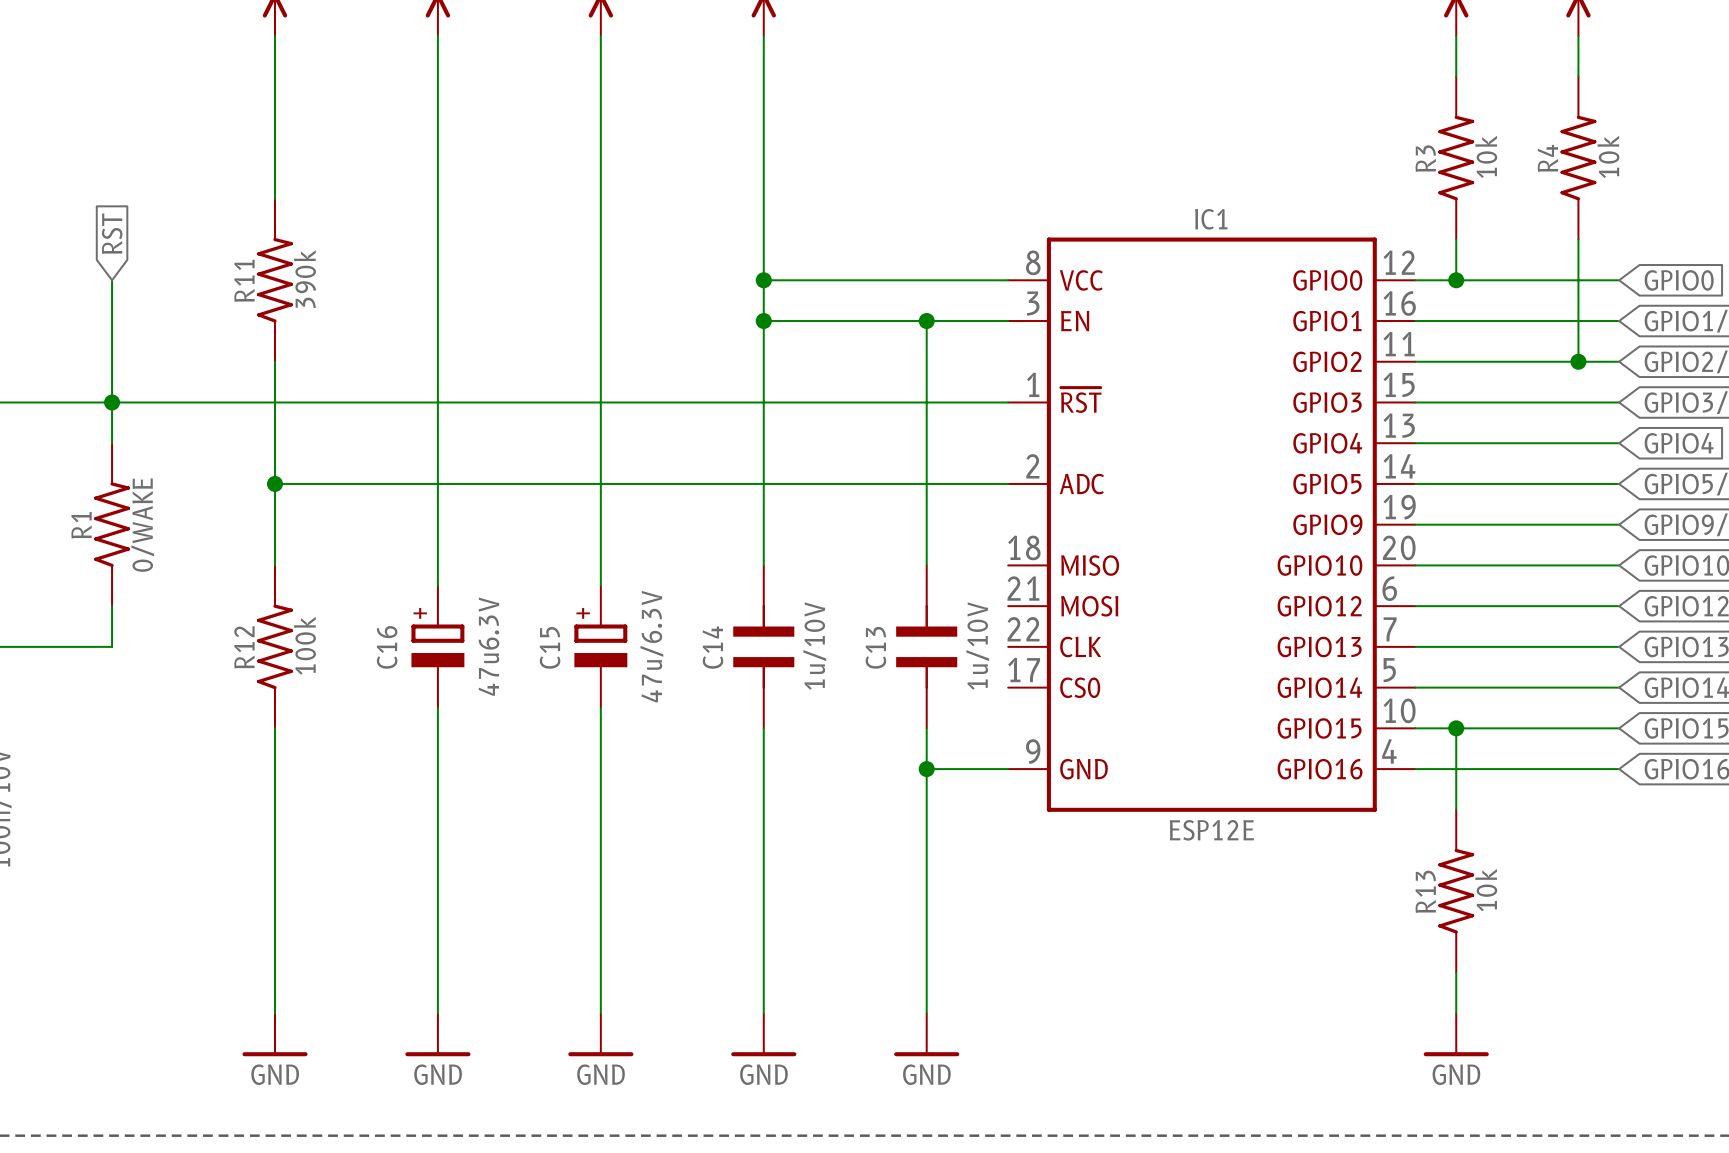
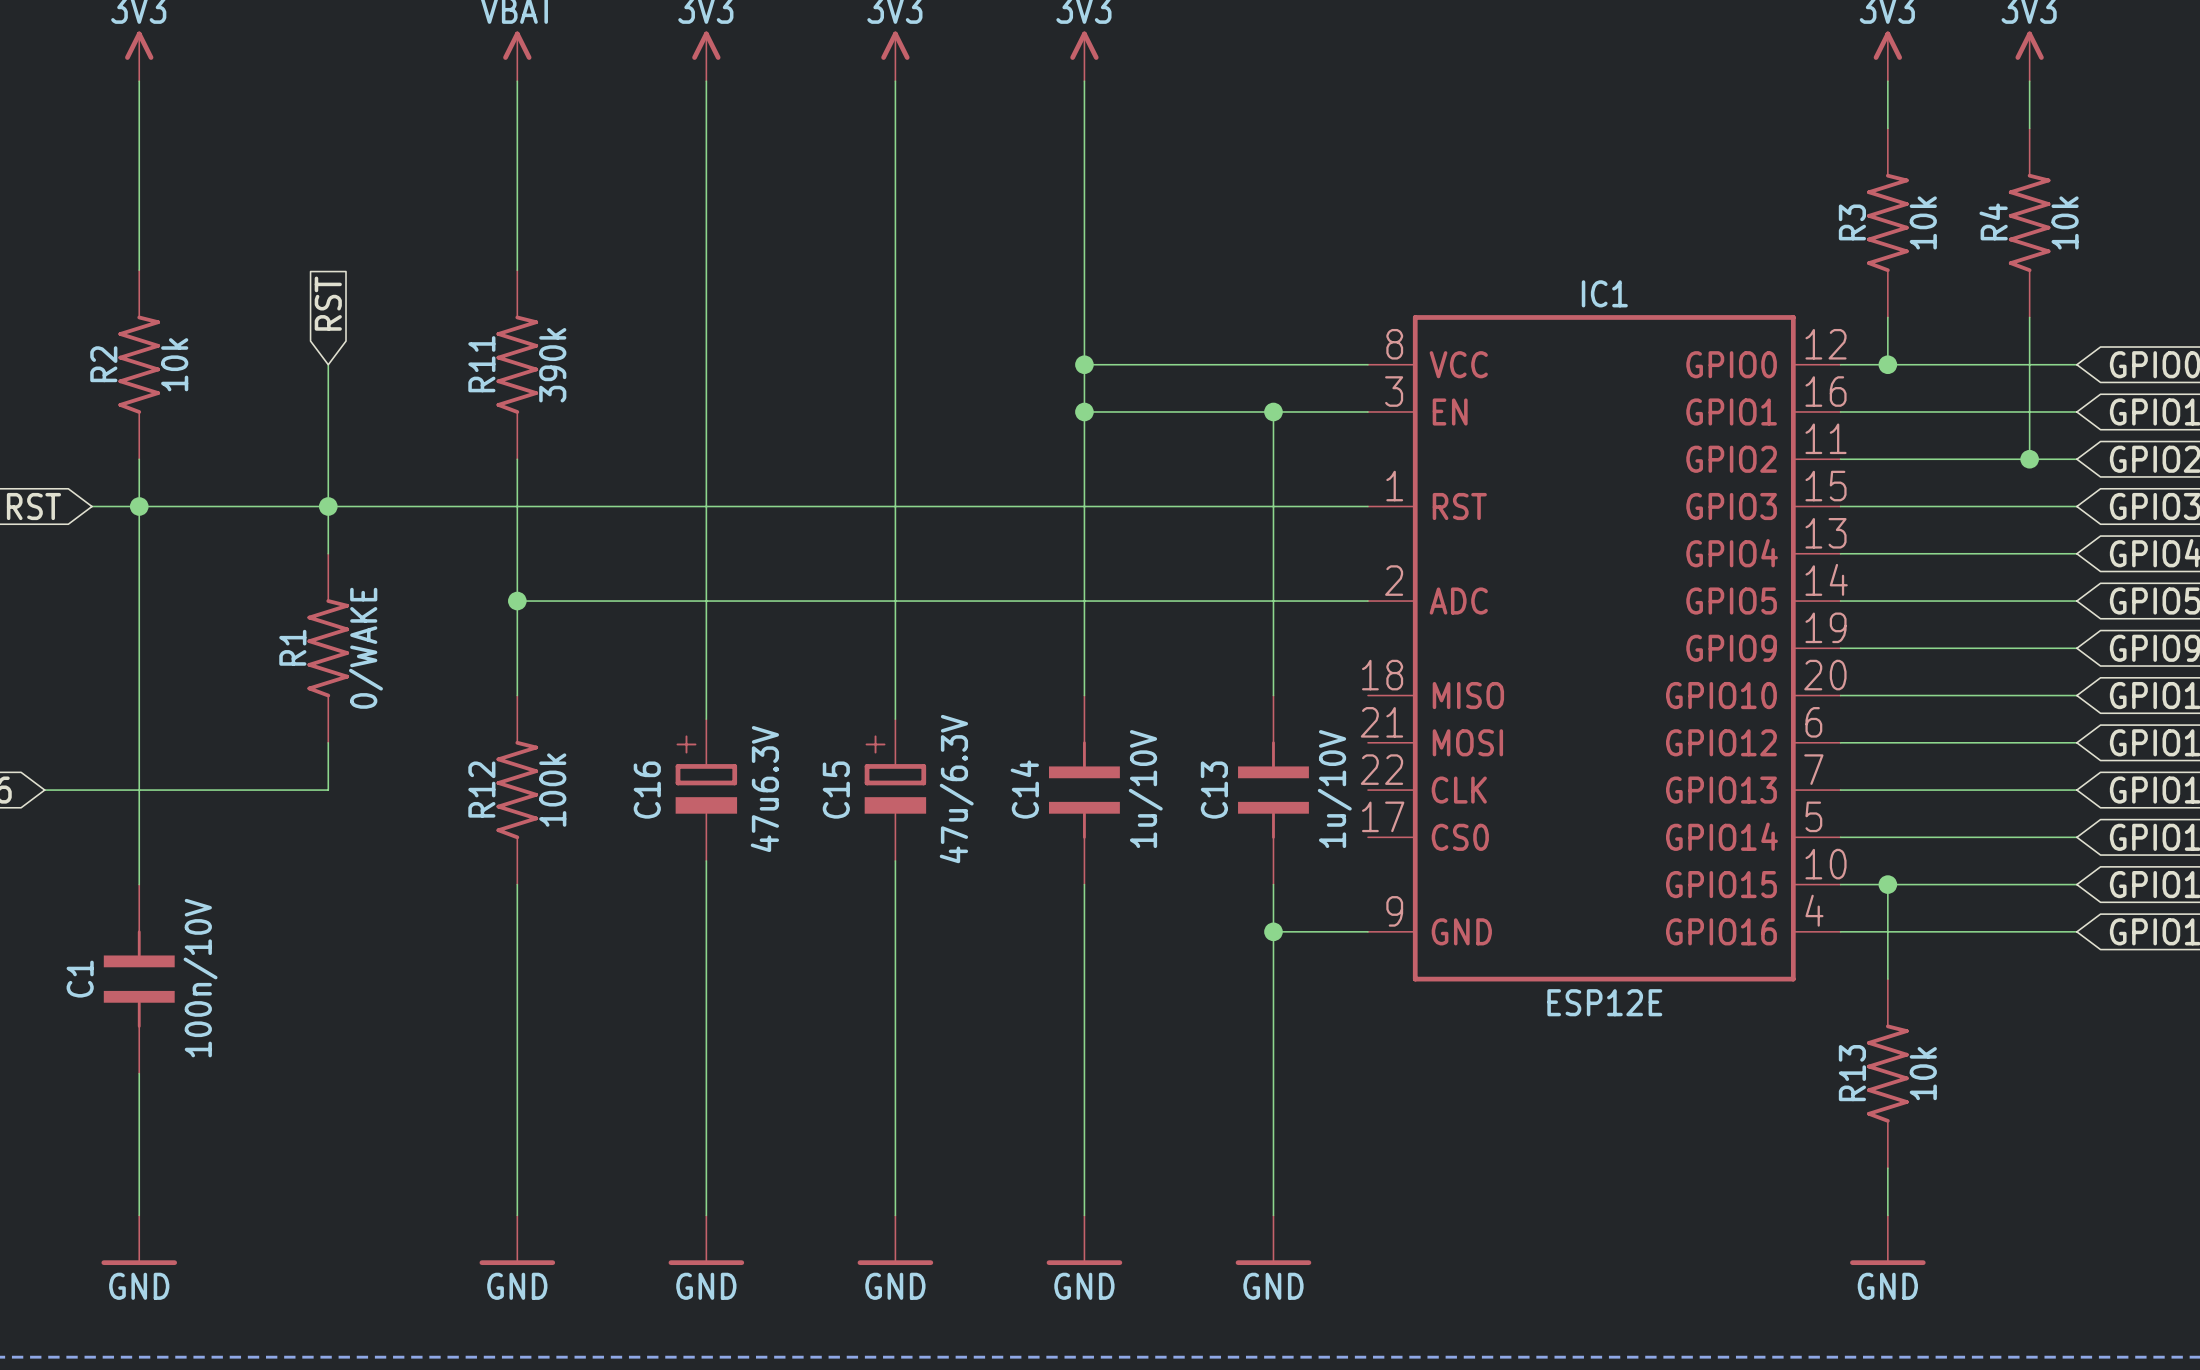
IC1 text: ~{RST} (1081, 400) -> RST (1459, 506)

